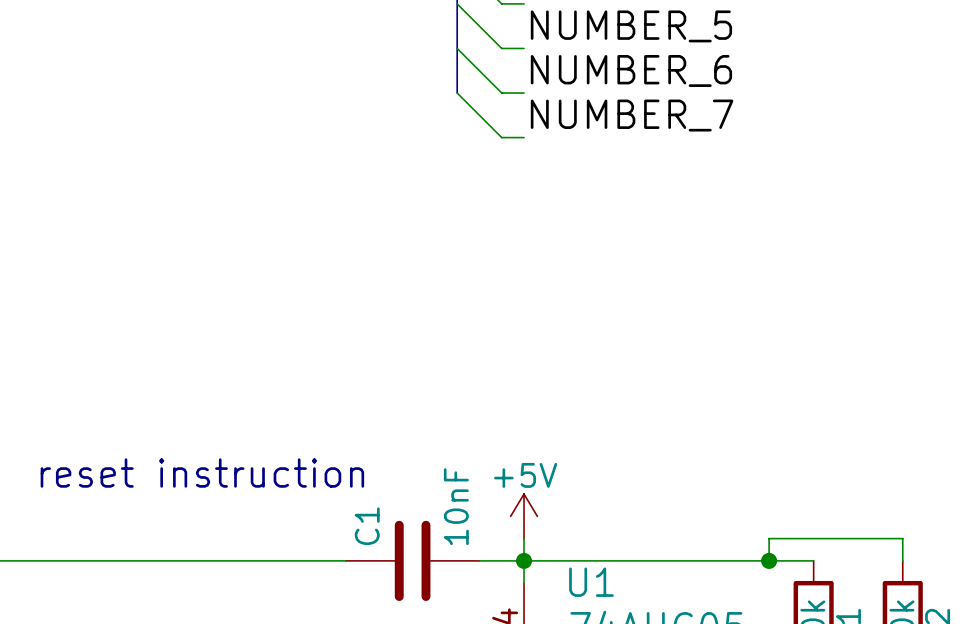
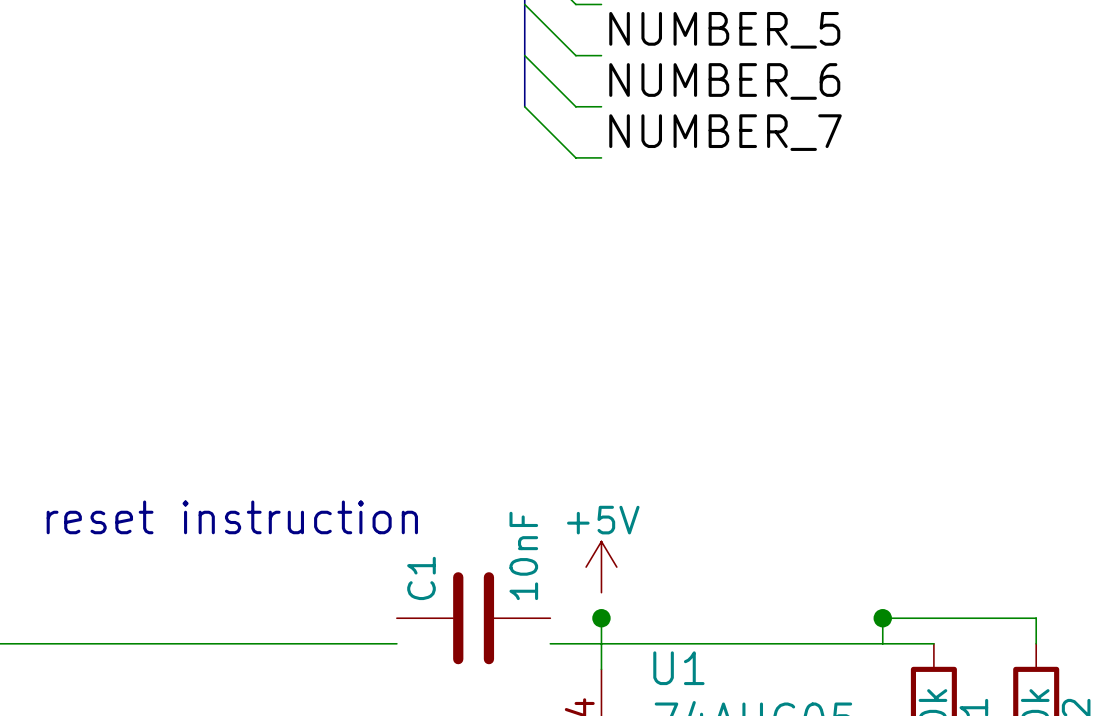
text position: reset instruction (202, 473) -> reset instruction (232, 517)
power symbol position: +5V (524, 516) -> +5V (601, 567)
C1 position: (412, 560) -> (473, 618)
junction position: (524, 560) -> (601, 618)
junction position: (769, 560) -> (882, 618)

